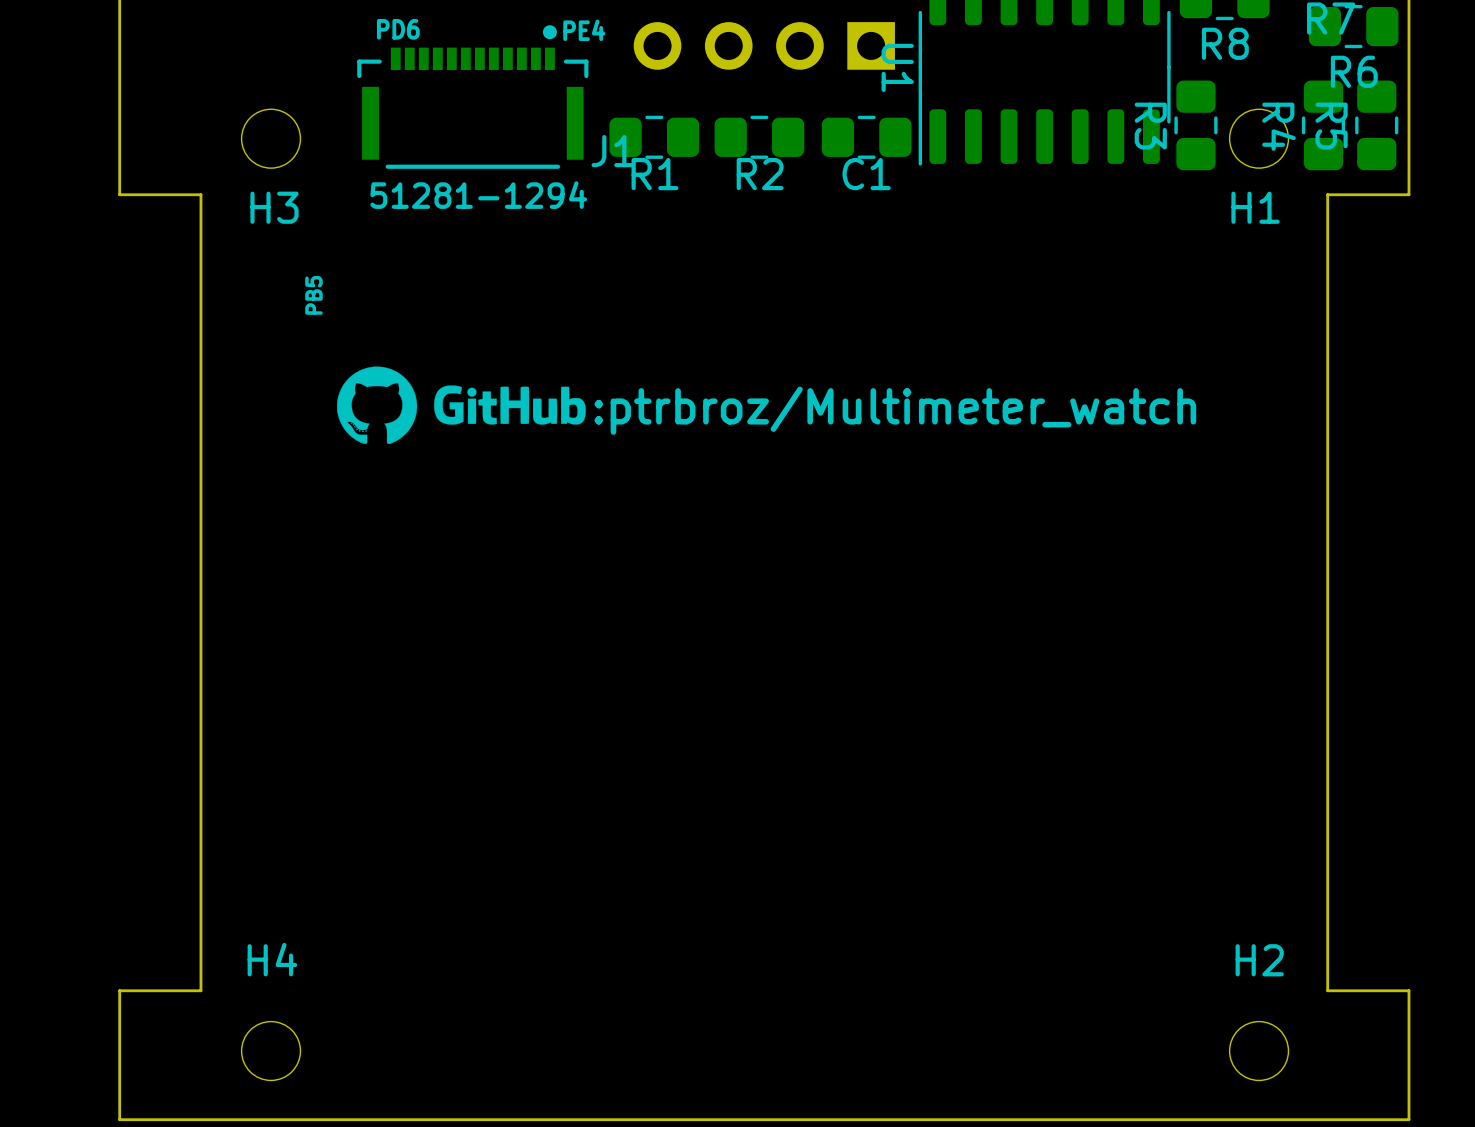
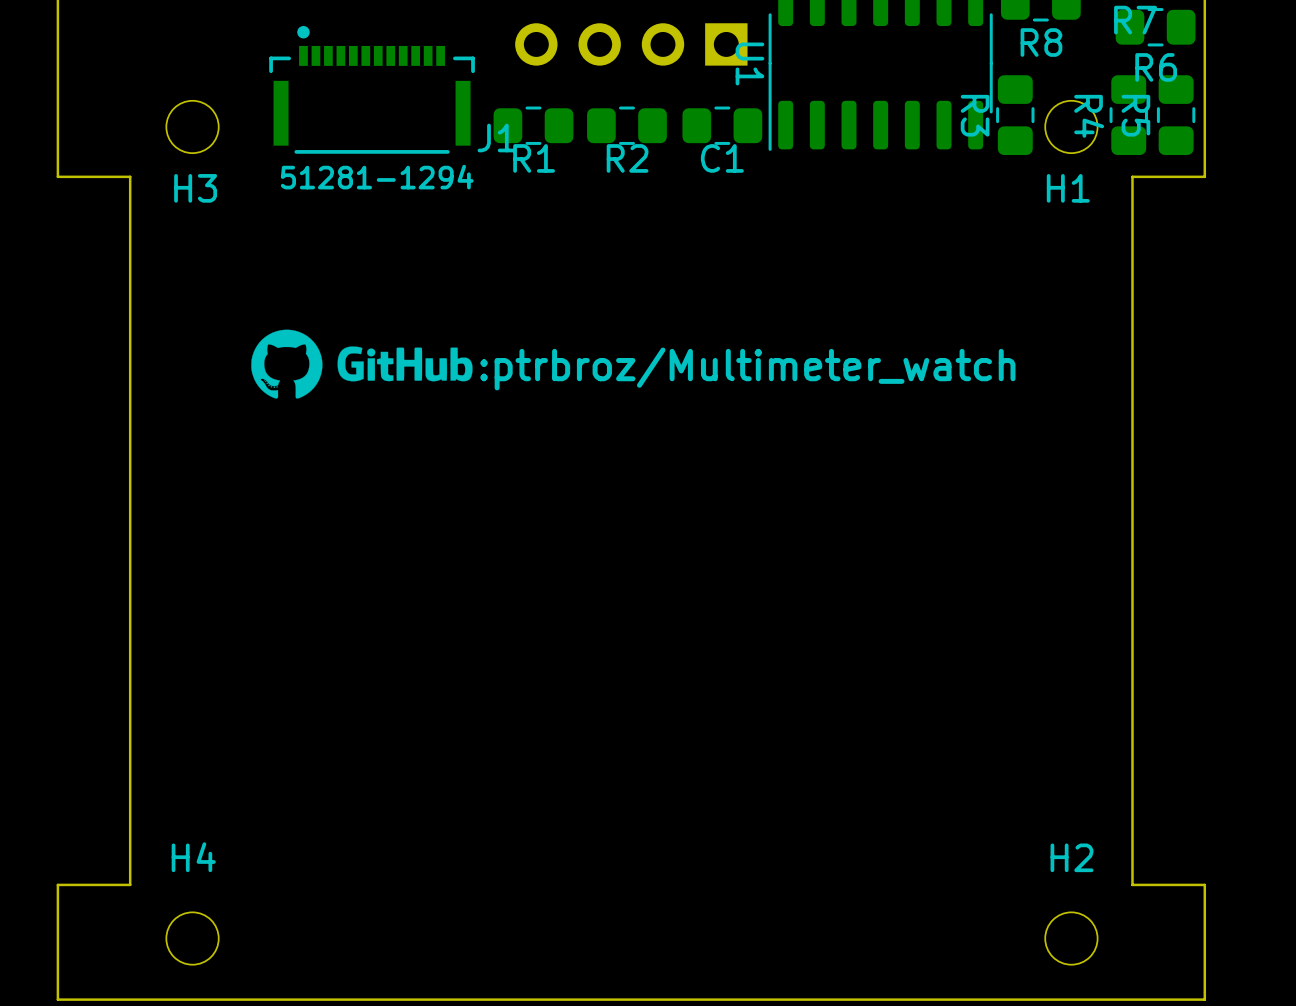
J1 footprint: [357, 25, 589, 169] -> [269, 25, 475, 154]
text: PD6 (398, 29) -> none
text: PE4 (584, 30) -> none
text: PB5 (313, 295) -> none

